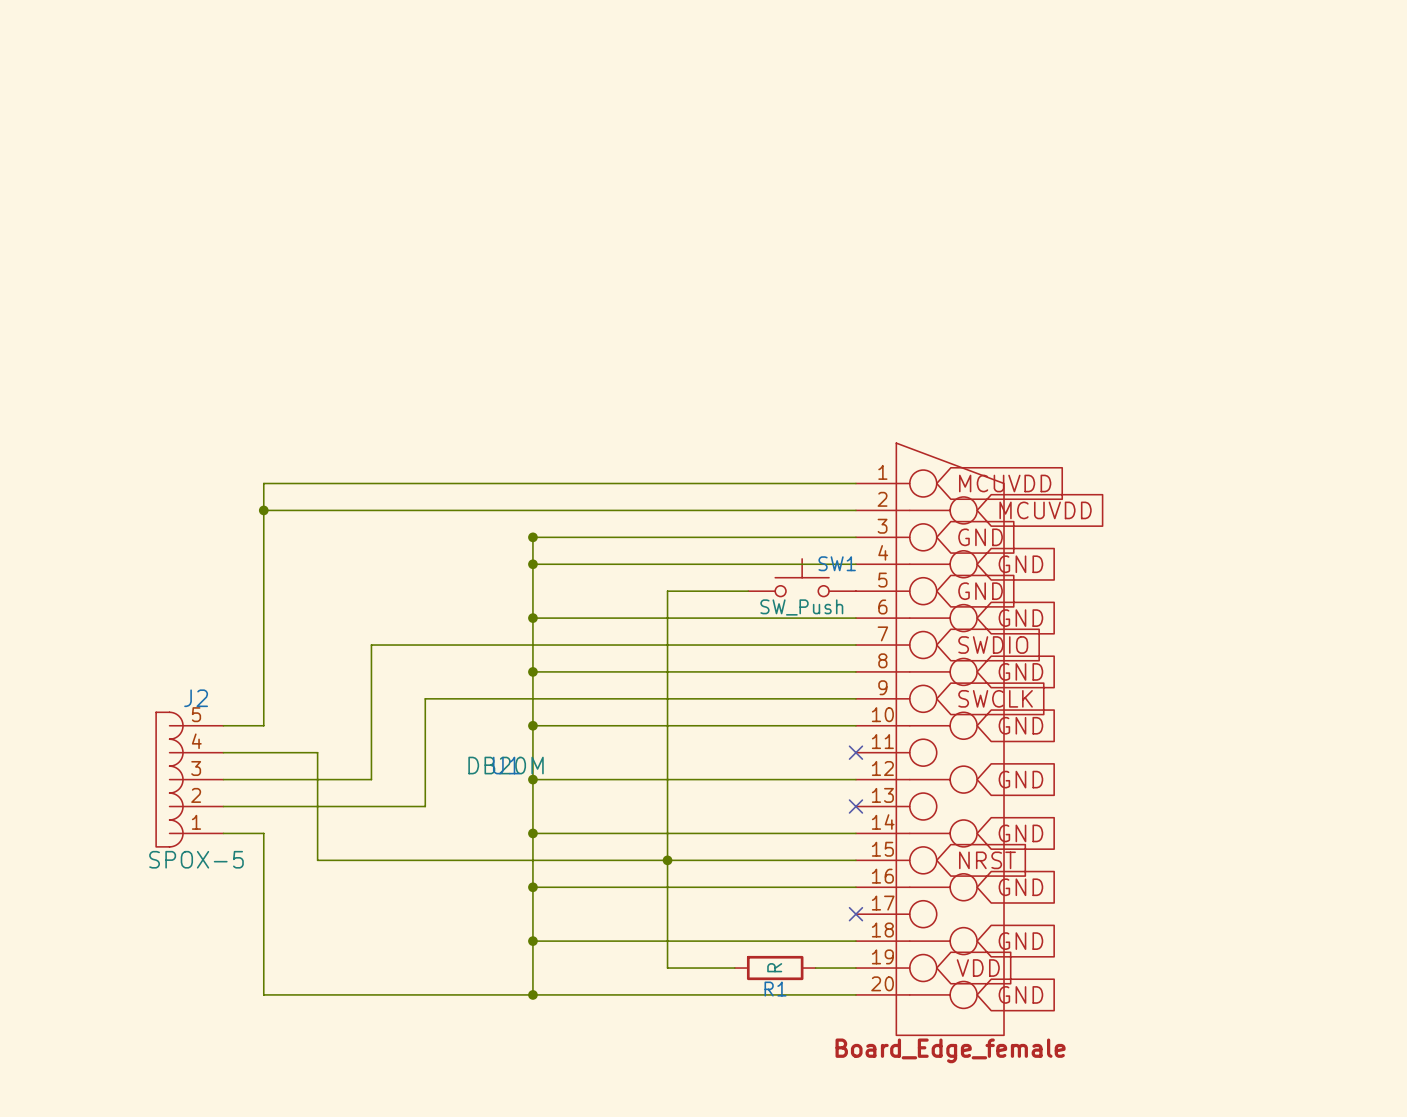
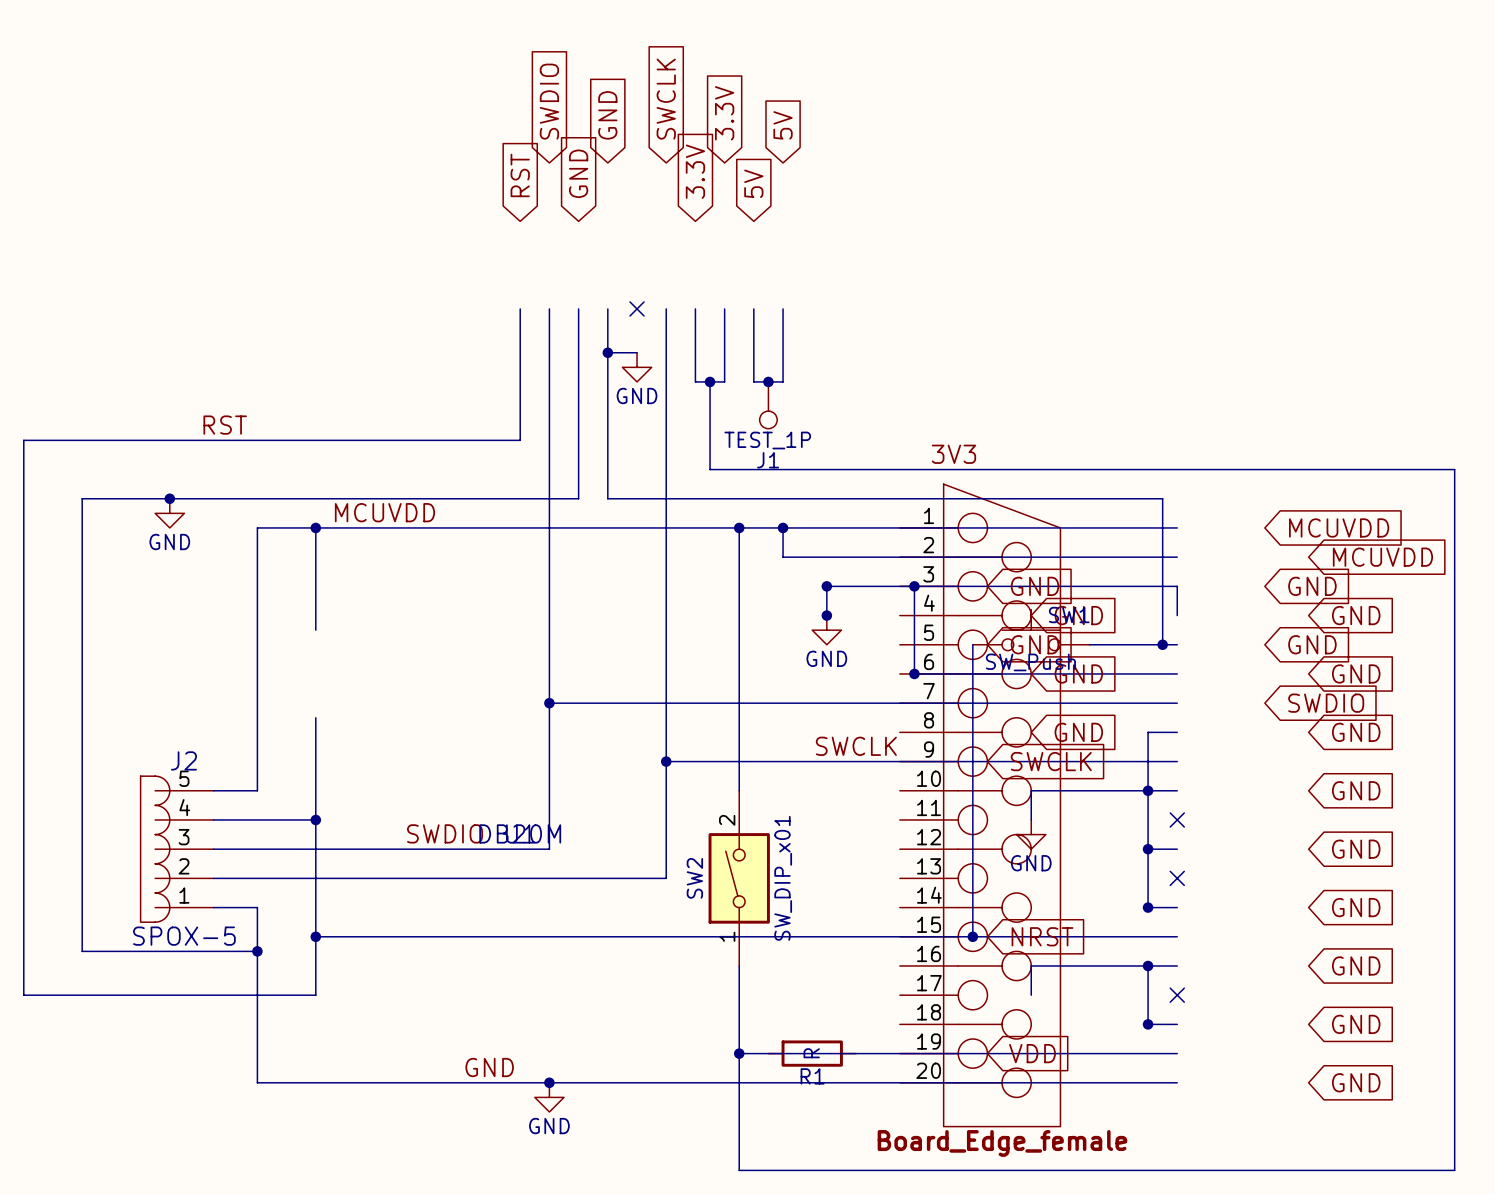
global label: none -> SWCLK (666, 99)
global label: none -> SWDIO (549, 101)
global label: none -> 3.3V (724, 113)
global label: none -> GND (607, 115)
global label: none -> 5V (783, 125)
global label: none -> 3.3V (695, 171)
global label: none -> GND (578, 173)
global label: none -> RST (520, 175)
global label: none -> 5V (753, 183)
wire: none -> (520, 308) (520, 440) (23, 440) (23, 995) (315, 995) (315, 936)
wire: none -> (549, 308) (549, 586)
wire: none -> (578, 308) (578, 498) (82, 498) (82, 951) (257, 951)
wire: none -> (607, 308) (607, 498) (1162, 498) (1162, 644)
no-connect mark: none -> (637, 308)
wire: none -> (695, 308) (695, 381) (724, 381) (724, 308)
wire: none -> (753, 308) (753, 381) (783, 381) (783, 308)
wire: none -> (607, 352) (637, 352)
junction: none -> (607, 352)
power symbol: none -> GND (637, 367)
wire: none -> (710, 381) (710, 469) (1454, 469) (1454, 1170) (739, 1170) (739, 965)
junction: none -> (710, 381)
junction: none -> (768, 381)
J1: none -> TEST_1P (768, 405)
label: none -> RST (225, 425)
label: none -> 3V3 (953, 454)
junction: none -> (169, 498)
label: none -> MCUVDD (384, 512)
power symbol: none -> GND (169, 513)
wire: none -> (315, 527) (315, 630)
junction: none -> (315, 527)
wire: none -> (739, 527) (739, 790)
junction: none -> (739, 527)
junction: none -> (783, 527)
wire: none -> (899, 527) (1177, 527)
global label: MCUVDD (1005, 483) -> none
global label: none -> MCUVDD (1339, 527)
wire: (263, 510) (748, 510) -> (783, 527) (783, 557)
junction: (263, 510) -> none
wire: none -> (899, 557) (1177, 557)
global label: MCUVDD (1045, 510) -> none
global label: none -> MCUVDD (1382, 557)
wire: (532, 537) (788, 537) -> (826, 615) (826, 586)
junction: (532, 537) -> none
junction: none -> (826, 586)
wire: none -> (899, 586) (1177, 586) (1177, 615)
wire: none -> (914, 586) (914, 673) (1177, 673)
junction: none -> (914, 586)
global label: none -> GND (1312, 586)
wire: (532, 564) (855, 564) -> none
junction: (532, 564) -> none
junction: none -> (826, 615)
global label: none -> GND (1356, 615)
power symbol: none -> GND (826, 630)
SW1 position: (802, 577) -> (1031, 630)
wire: (748, 591) (667, 591) (667, 968) (707, 968) -> none
wire: none -> (972, 644) (972, 936)
wire: none -> (1089, 644) (1177, 644)
junction: none -> (1162, 644)
global label: none -> GND (1312, 644)
wire: (532, 618) (855, 618) -> none
junction: (532, 618) -> none
junction: none -> (914, 673)
global label: none -> GND (1356, 673)
wire: (532, 645) (371, 645) (371, 779) -> (549, 849) (374, 849)
junction: none -> (549, 703)
wire: none -> (899, 703) (1177, 703)
global label position: SWDIO (993, 645) -> SWDIO (1326, 703)
wire: none -> (315, 717) (315, 819)
wire: (532, 671) (855, 671) -> none
junction: (532, 671) -> none
wire: none -> (1177, 732) (1148, 732) (1148, 907) (1177, 907)
global label: none -> GND (1356, 732)
label: none -> SWCLK (856, 746)
wire: (640, 698) (425, 698) (425, 806) -> (666, 308) (666, 878) (432, 878)
junction: none -> (666, 761)
wire: none -> (899, 761) (1177, 761)
wire: (532, 725) (855, 725) -> none
junction: (532, 725) -> none
global label: GND (1020, 725) -> none
junction: none -> (1148, 790)
wire: none -> (1177, 790) (1031, 790) (1031, 819)
global label: none -> GND (1356, 790)
junction: none -> (315, 819)
no-connect mark: (855, 752) -> none
no-connect mark: none -> (1177, 819)
label: none -> SWDIO (445, 833)
power symbol: none -> GND (1031, 834)
junction: (532, 779) -> none
wire: (855, 779) (532, 779) (532, 994) -> none
global label: GND (1020, 779) -> none
wire: none -> (1148, 849) (1177, 849)
junction: none -> (1148, 849)
global label: none -> GND (1356, 849)
SW2: none -> SW_DIP_x01 (739, 878)
no-connect mark: (855, 806) -> none
no-connect mark: none -> (1177, 878)
wire: (532, 833) (855, 833) -> none
junction: (532, 833) -> none
global label: GND (1020, 833) -> none
junction: none -> (1148, 907)
global label: none -> GND (1356, 907)
junction: none -> (315, 936)
junction: (667, 860) -> none
wire: none -> (899, 936) (1177, 936)
junction: none -> (972, 936)
junction: none -> (257, 951)
wire: (532, 887) (855, 887) -> none
junction: (532, 887) -> none
global label: GND (1020, 887) -> none
wire: none -> (1148, 965) (1148, 1024) (1177, 1024)
junction: none -> (1148, 965)
wire: none -> (1177, 965) (1031, 965) (1031, 995)
global label: none -> GND (1356, 965)
no-connect mark: (855, 914) -> none
no-connect mark: none -> (1177, 995)
wire: (532, 941) (855, 941) -> none
junction: (532, 941) -> none
global label: GND (1020, 941) -> none
junction: none -> (1148, 1024)
global label: none -> GND (1356, 1024)
junction: none -> (739, 1053)
wire: none -> (768, 1053) (856, 1053)
wire: none -> (899, 1053) (1177, 1053)
label: none -> GND (489, 1067)
wire: none -> (899, 1082) (1177, 1082)
global label: GND (1020, 994) -> none
global label: none -> GND (1356, 1082)
power symbol: none -> GND (549, 1097)

